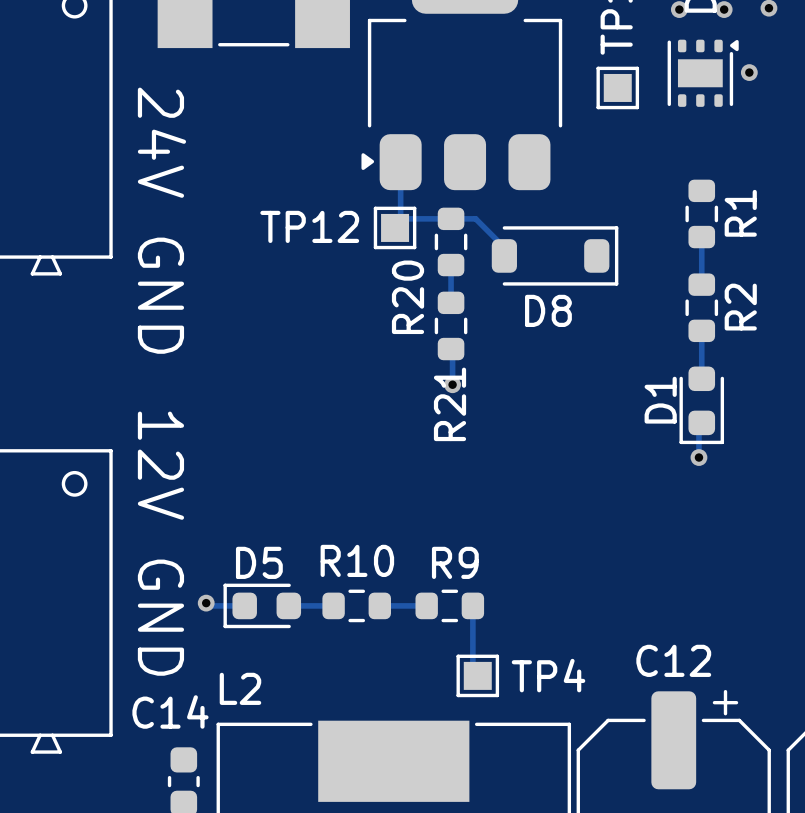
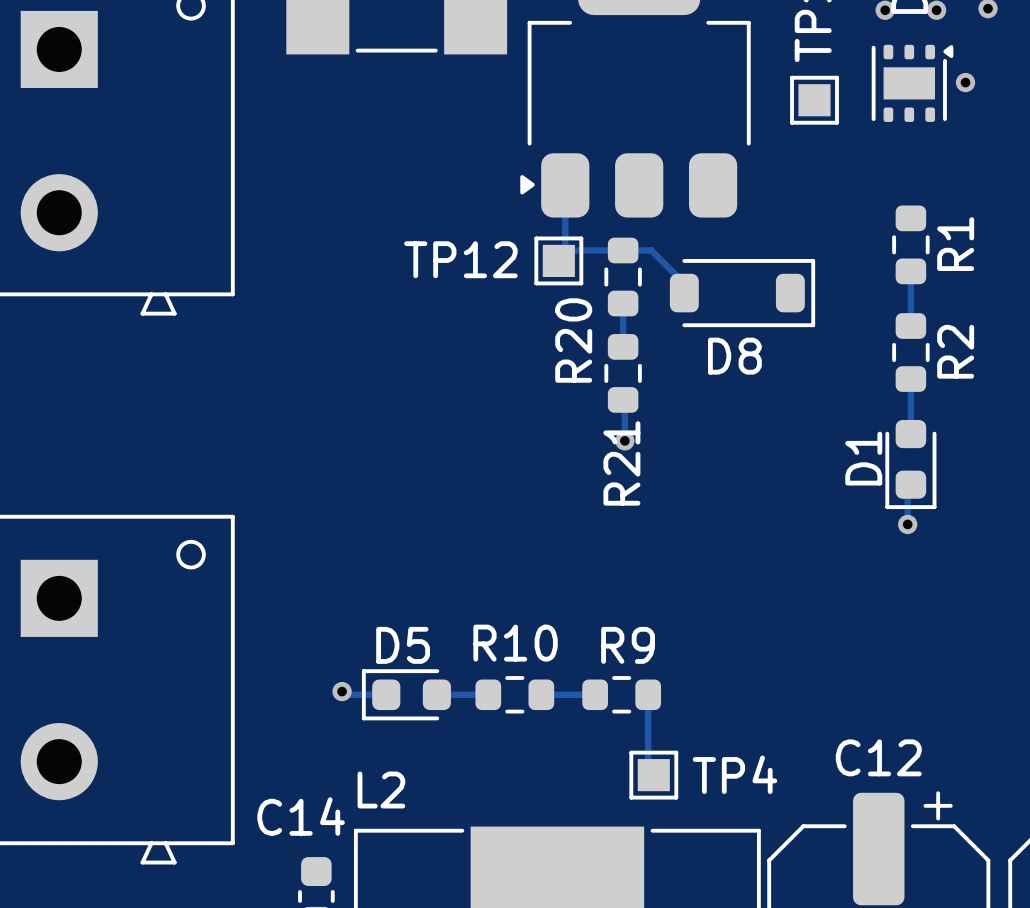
text: 24V GND (161, 220) -> none
text: 12V GND (160, 543) -> none

